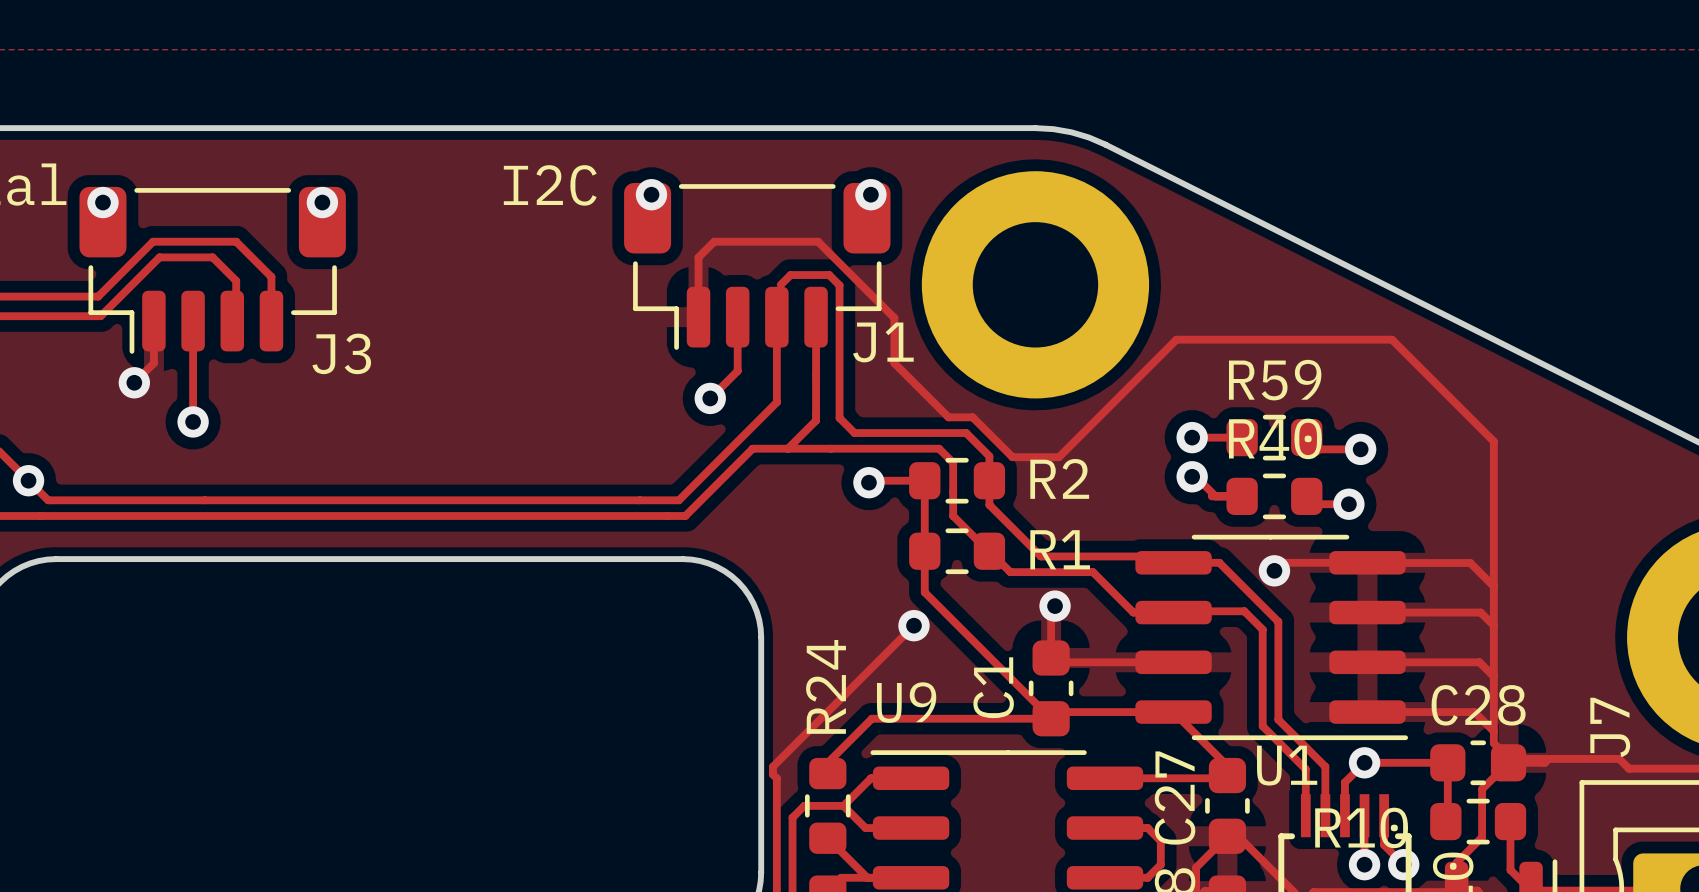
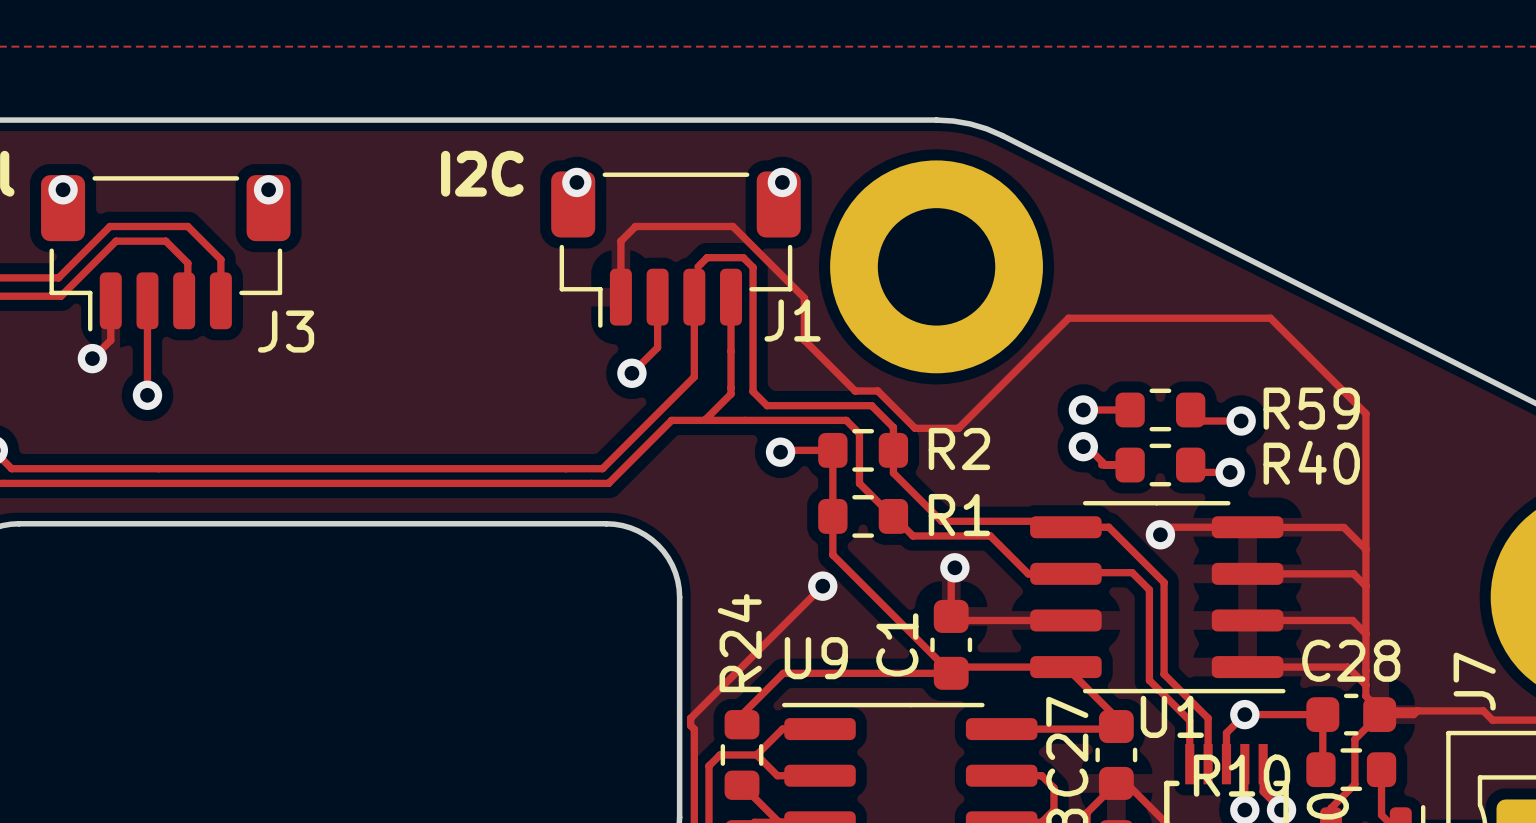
R59 name position: R59 (1275, 380) -> R59 (1311, 408)
R40 name position: R40 (1275, 438) -> R40 (1311, 462)

